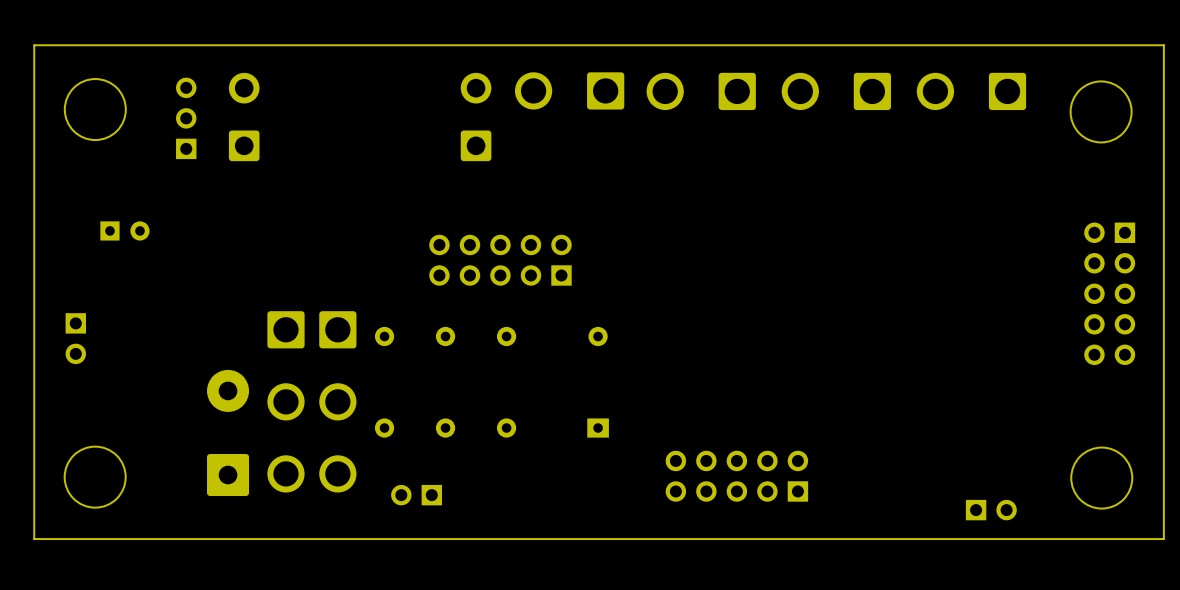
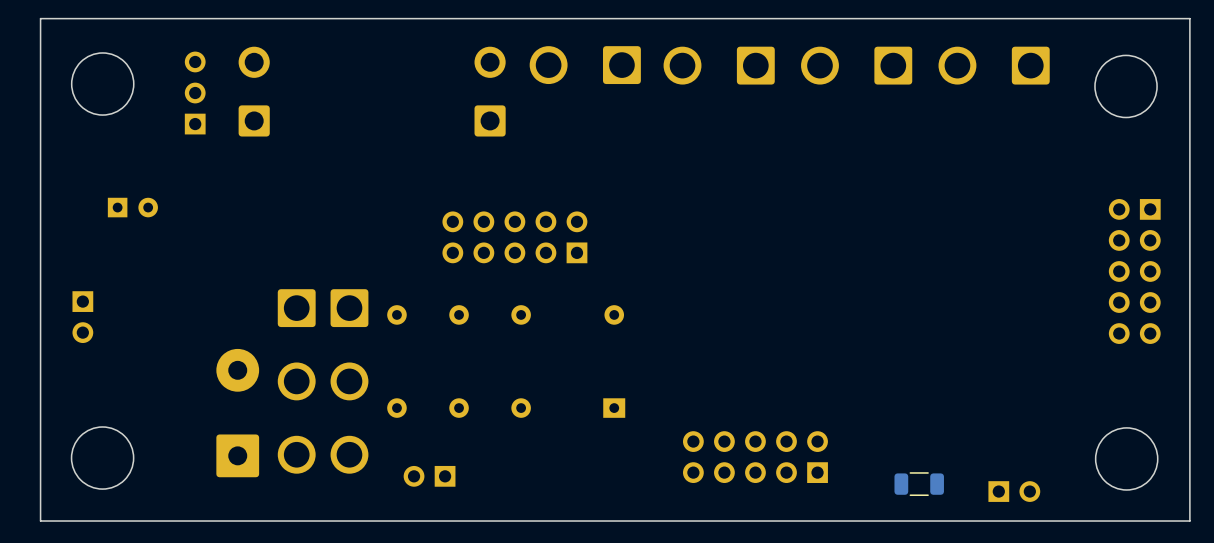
part: none -> (919, 484)

